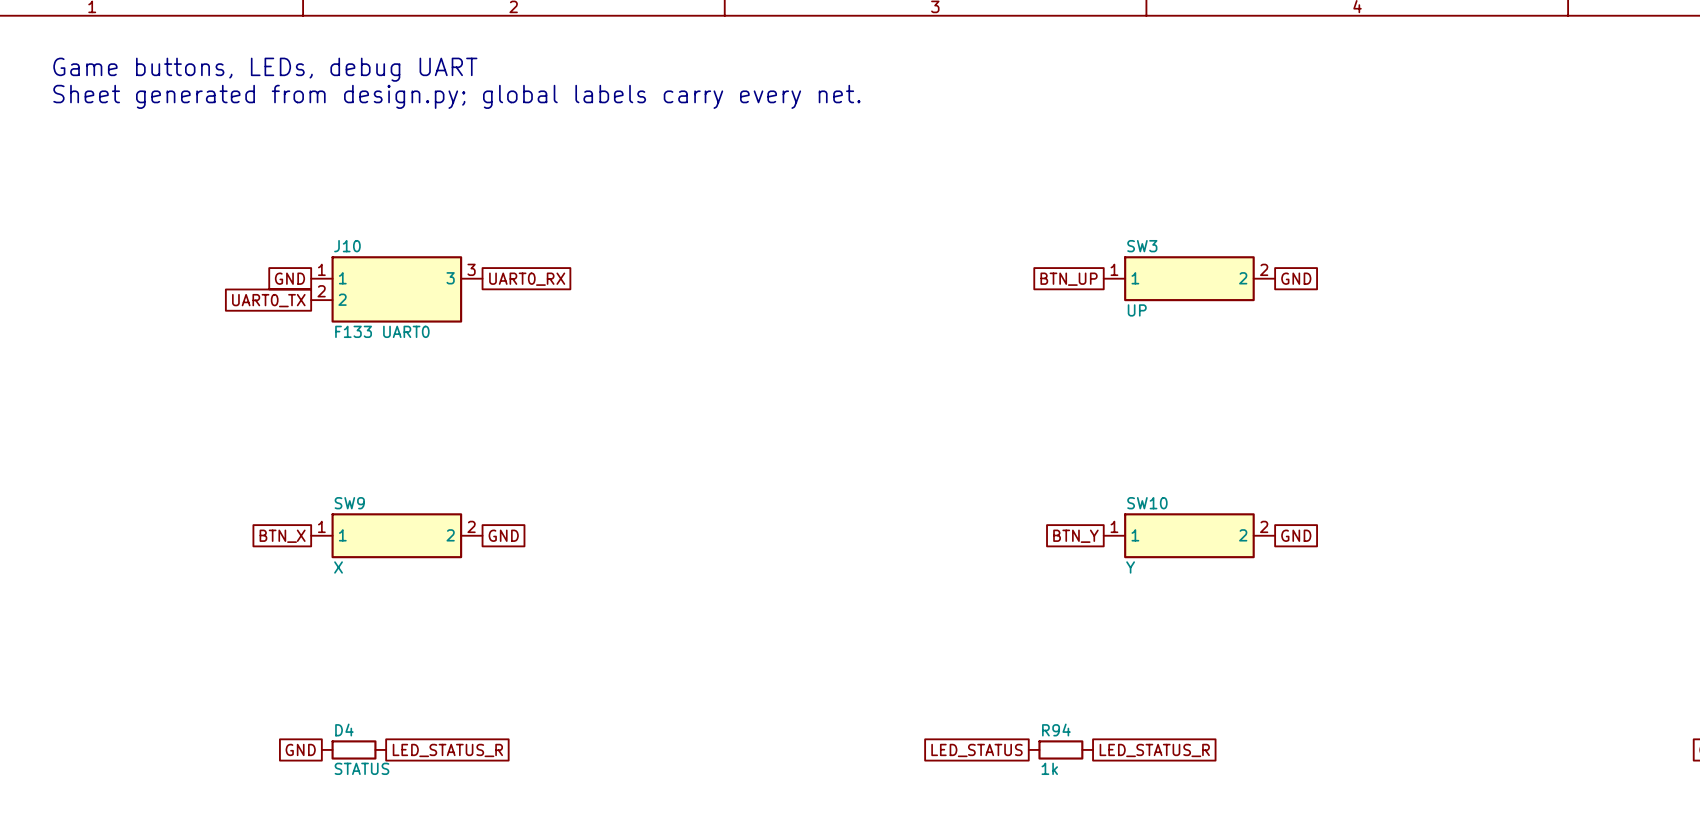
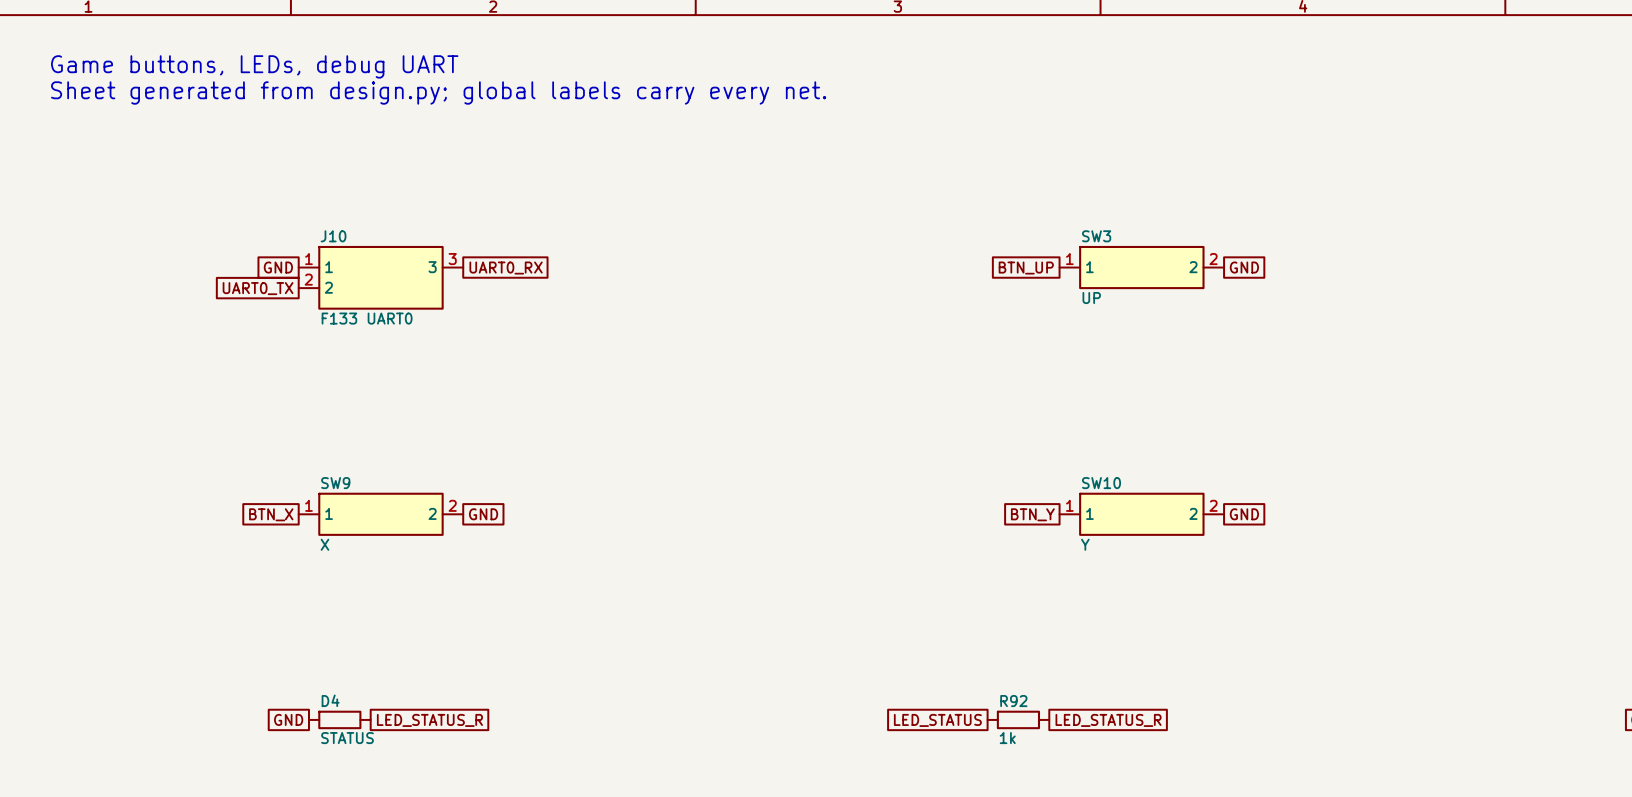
R94 name: R94 (1056, 730) -> R92 (1013, 701)

